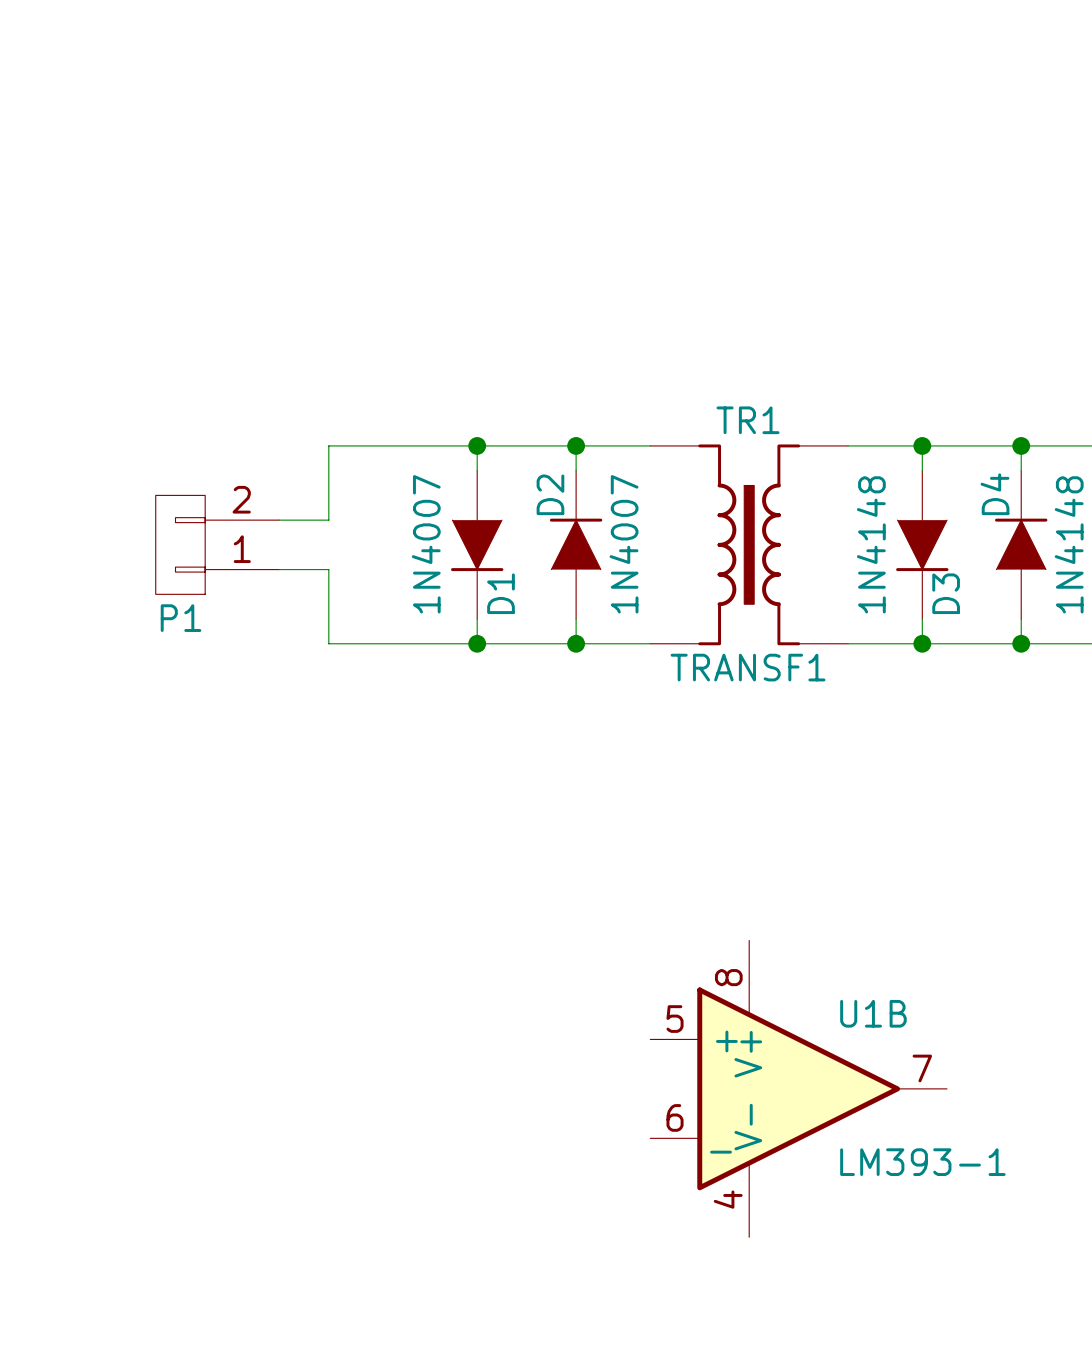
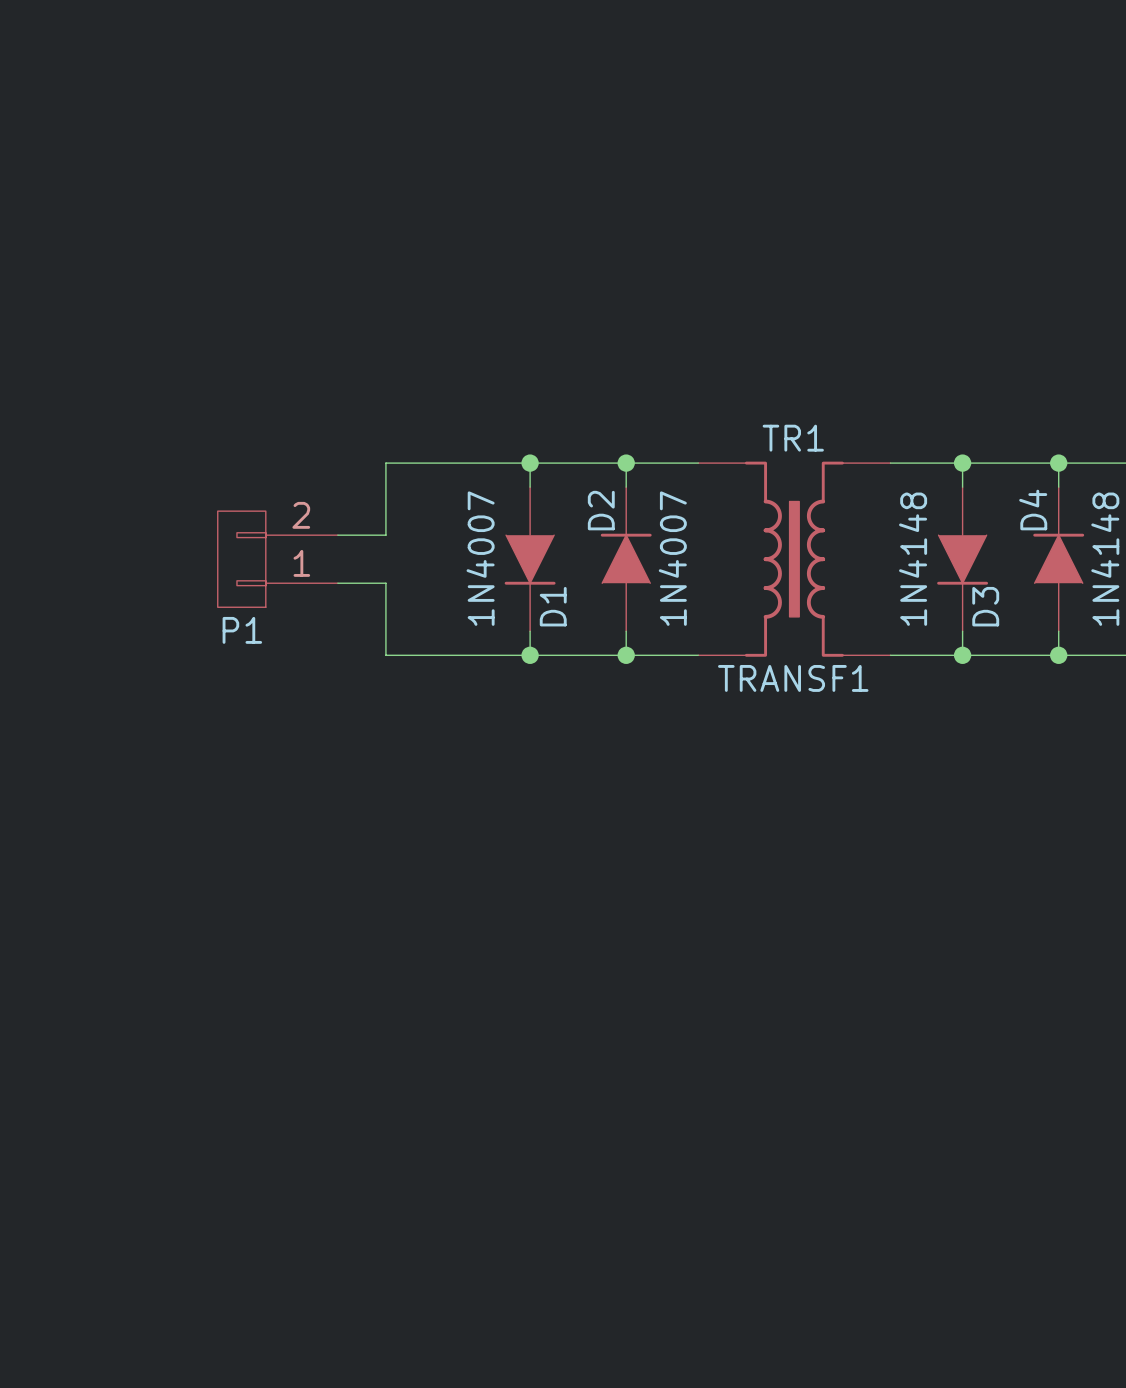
U1B: LM393-1 (798, 1088) -> none

